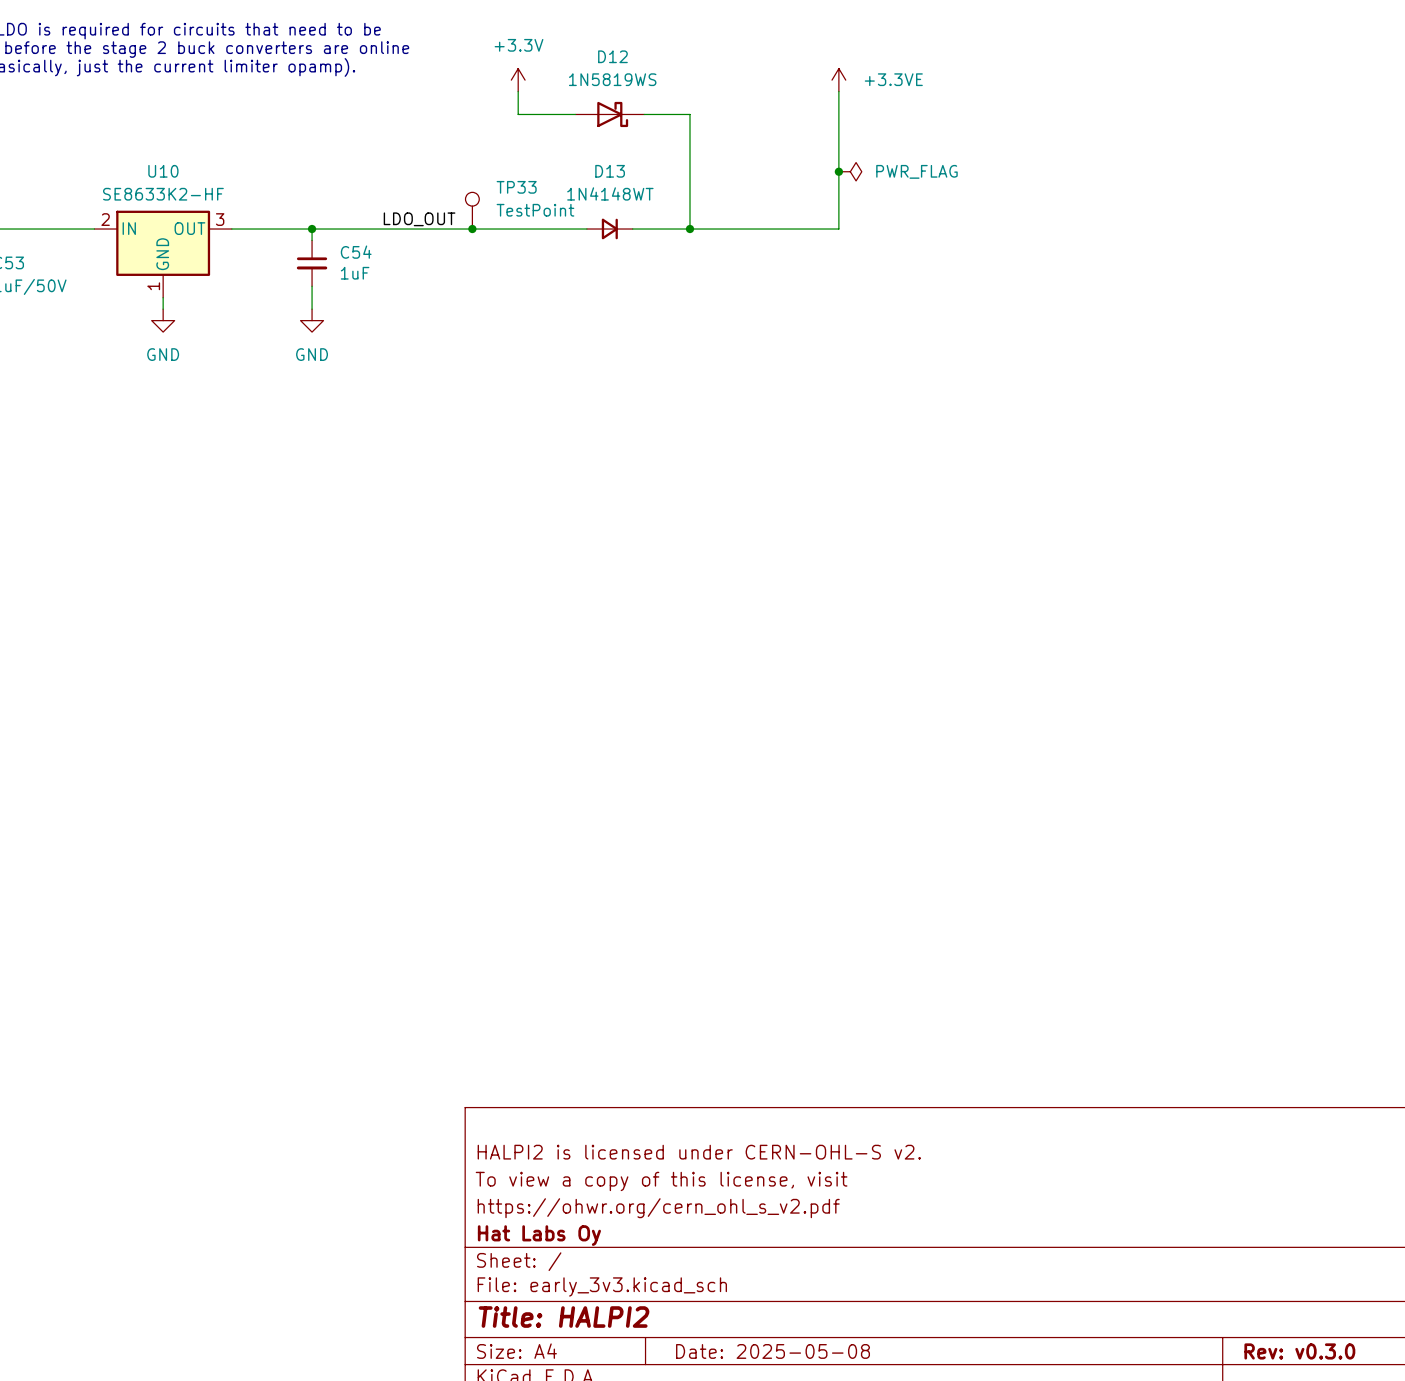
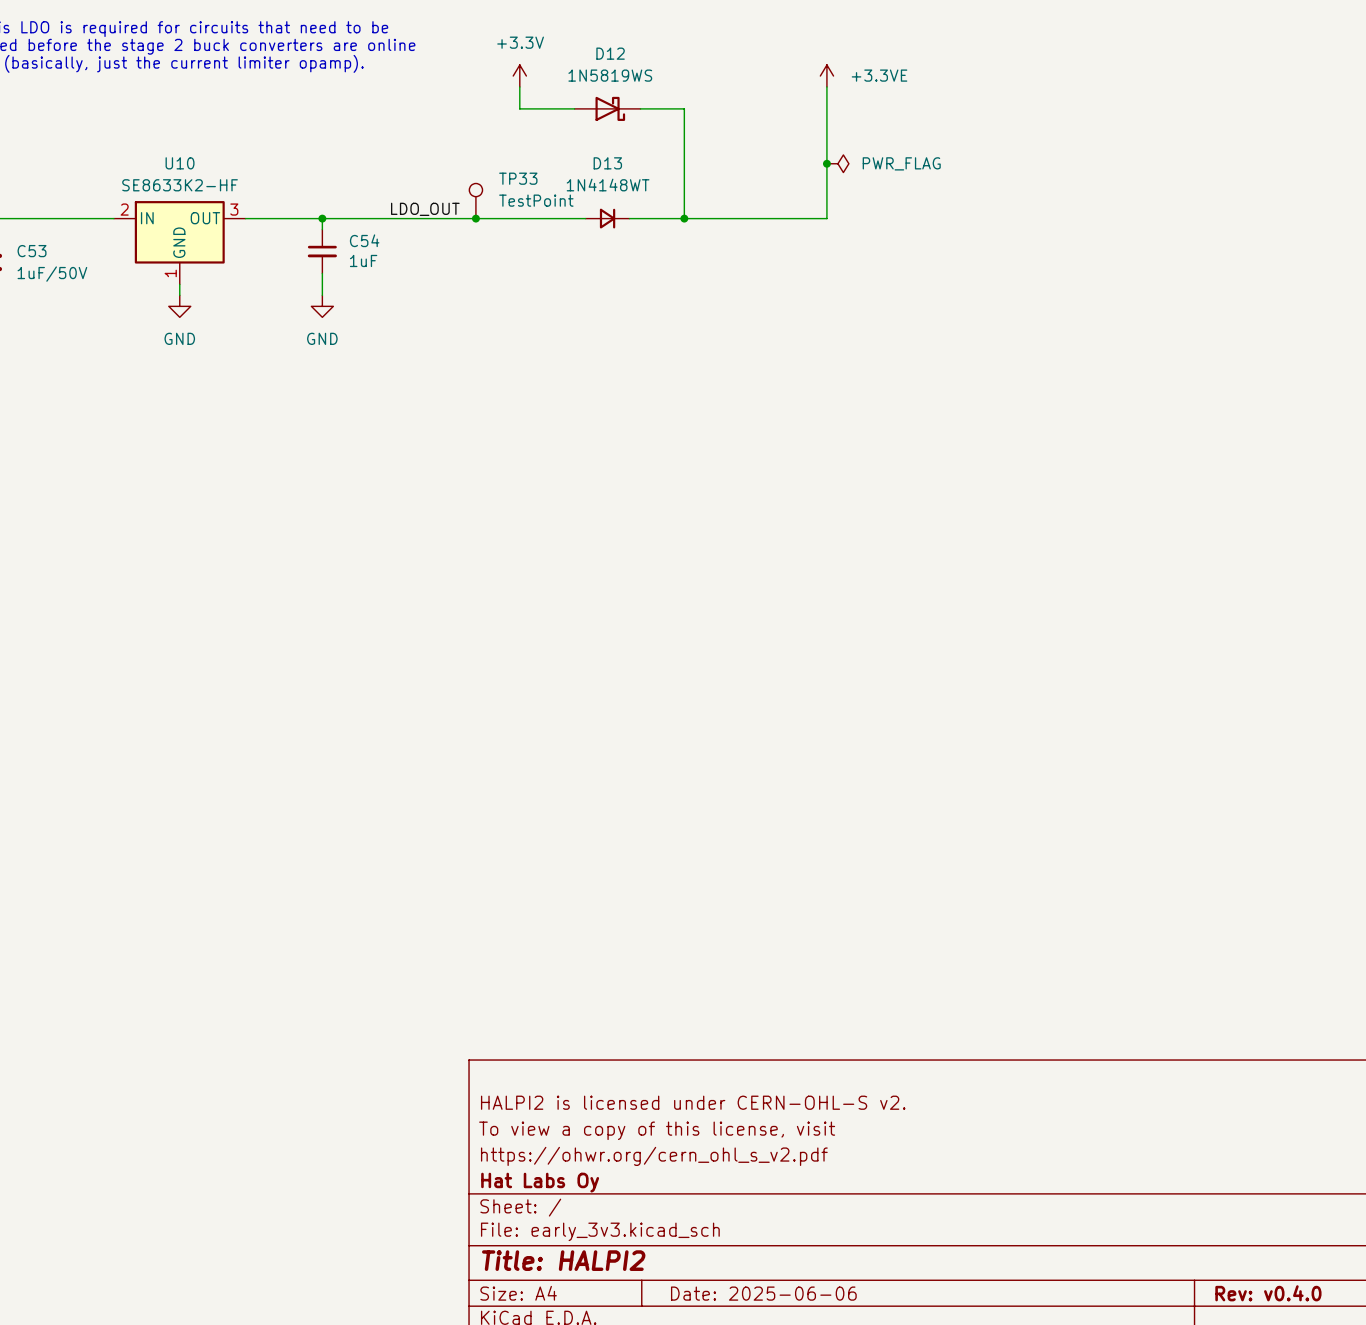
title block: Date: 2025-05-08 (773, 1351) -> Date: 2025-06-06 (763, 1293)
title block: Rev: v0.3.0 (1299, 1351) -> Rev: v0.4.0 (1268, 1293)

